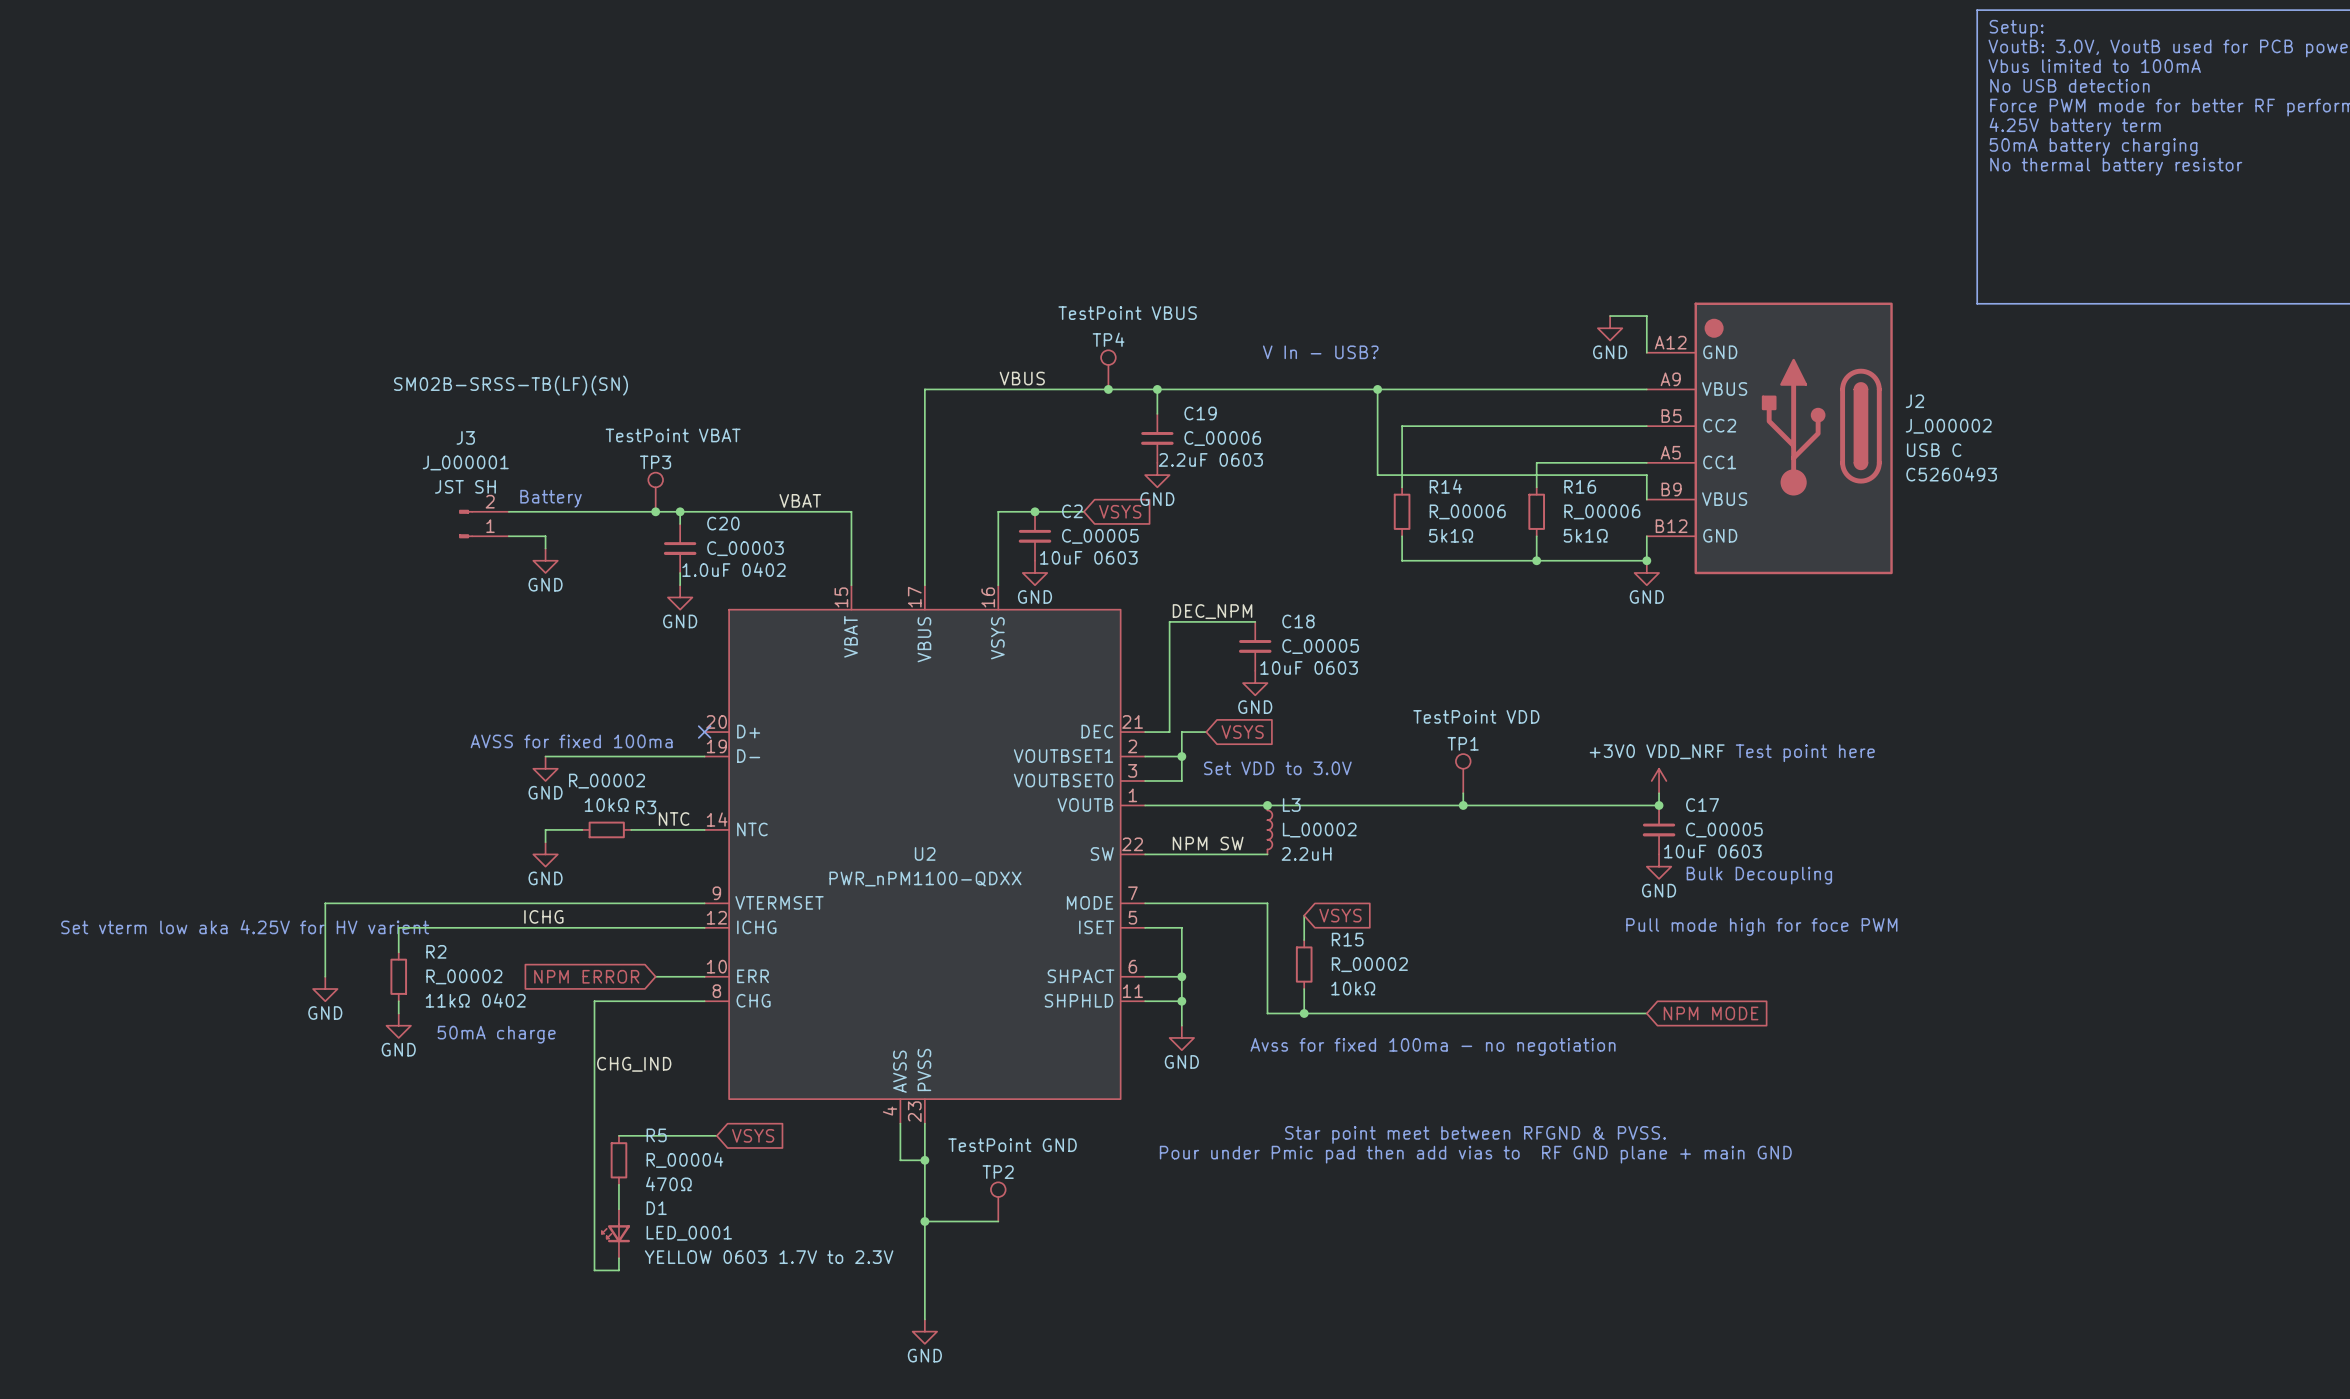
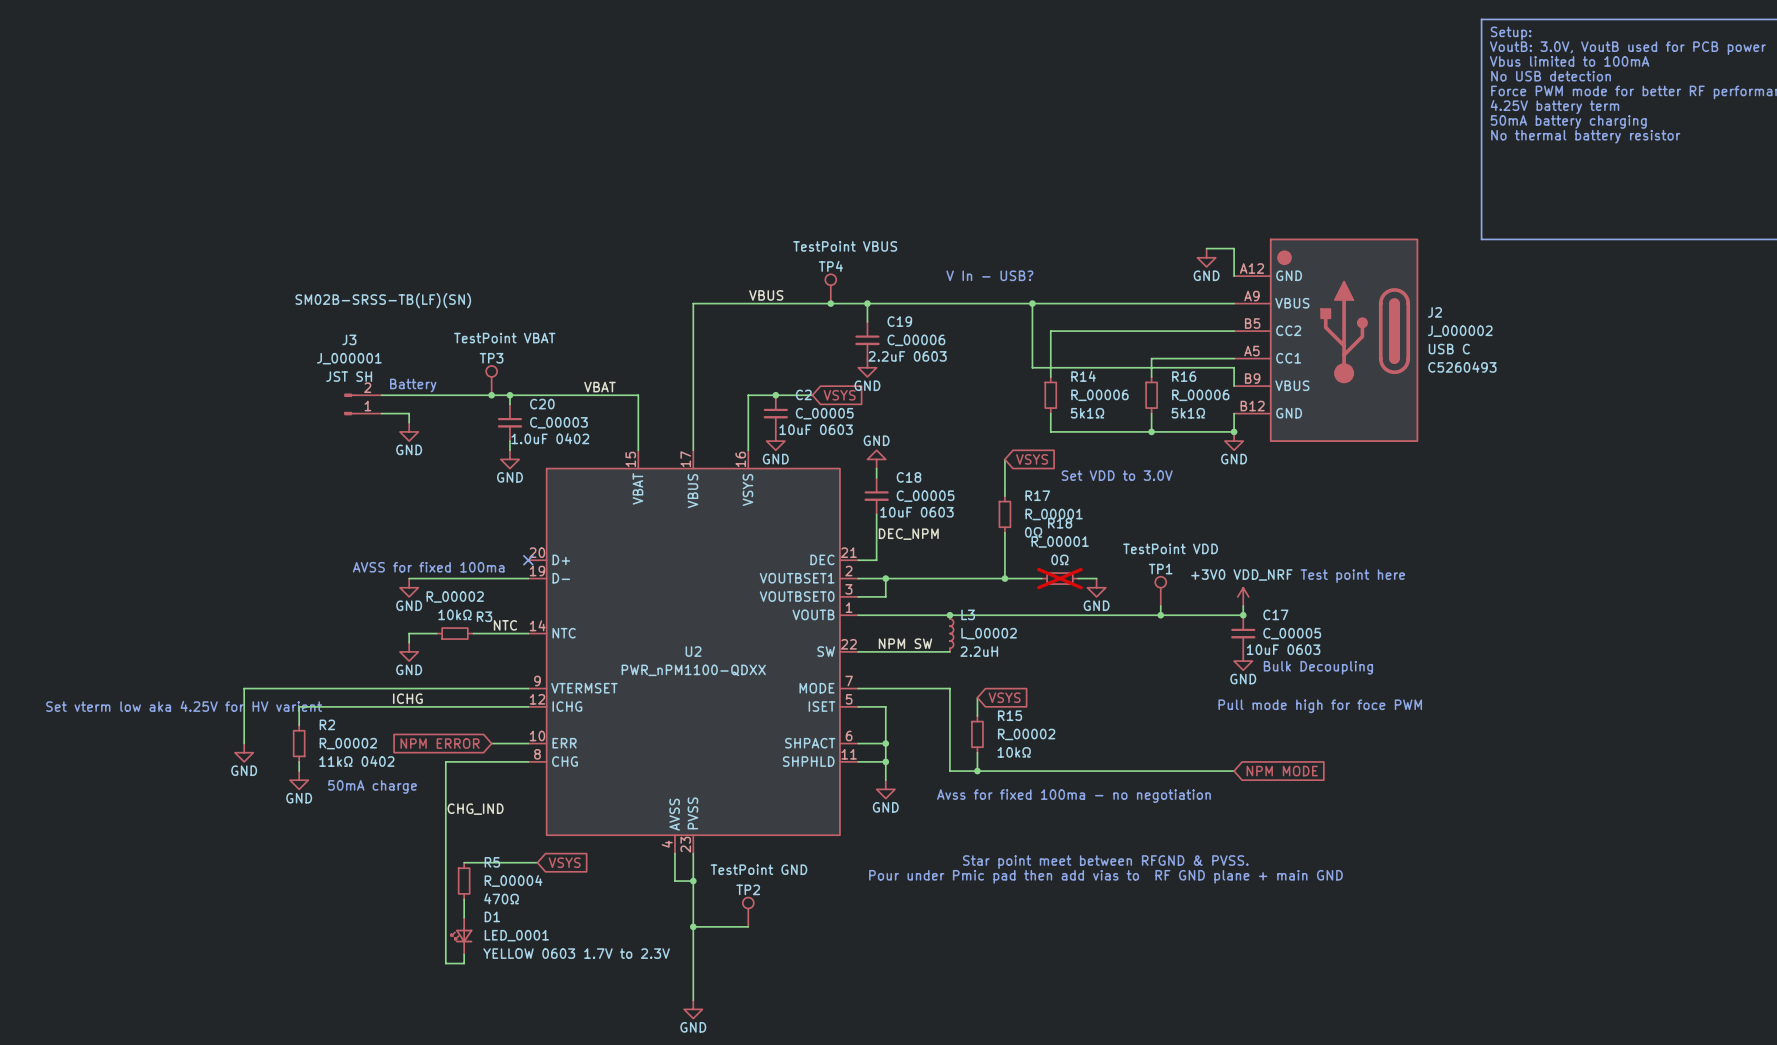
power symbol: none -> GND (876, 459)
wire: none -> (1004, 459) (1004, 496)
wire: none -> (876, 468) (876, 477)
label position: DEC_NPM (1212, 611) -> DEC_NPM (908, 534)
text: none -> Set VDD to 3.0V (1117, 475)
wire: (1255, 621) (1169, 621) (1169, 670) -> none
C18 position: (1255, 646) -> (876, 496)
R17: none -> R_00001 (1004, 514)
power symbol: GND (1255, 683) -> none
wire: none -> (1004, 532) (1004, 578)
wire: (1206, 732) (1181, 732) (1181, 756) -> (1041, 578) (885, 578)
global label position: VSYS (1242, 732) -> VSYS (1032, 459)
junction: none -> (1004, 578)
R18: none -> R_00001 (1059, 578)
wire: none -> (1078, 578) (1096, 578)
text: Set VDD to 3.0V (1277, 768) -> none
power symbol: none -> GND (1096, 587)
TP1 position: (1463, 773) -> (1160, 591)
wire: (1463, 793) (1463, 805) -> (1160, 606) (1160, 615)
junction: (1463, 805) -> none
junction: none -> (1160, 615)

